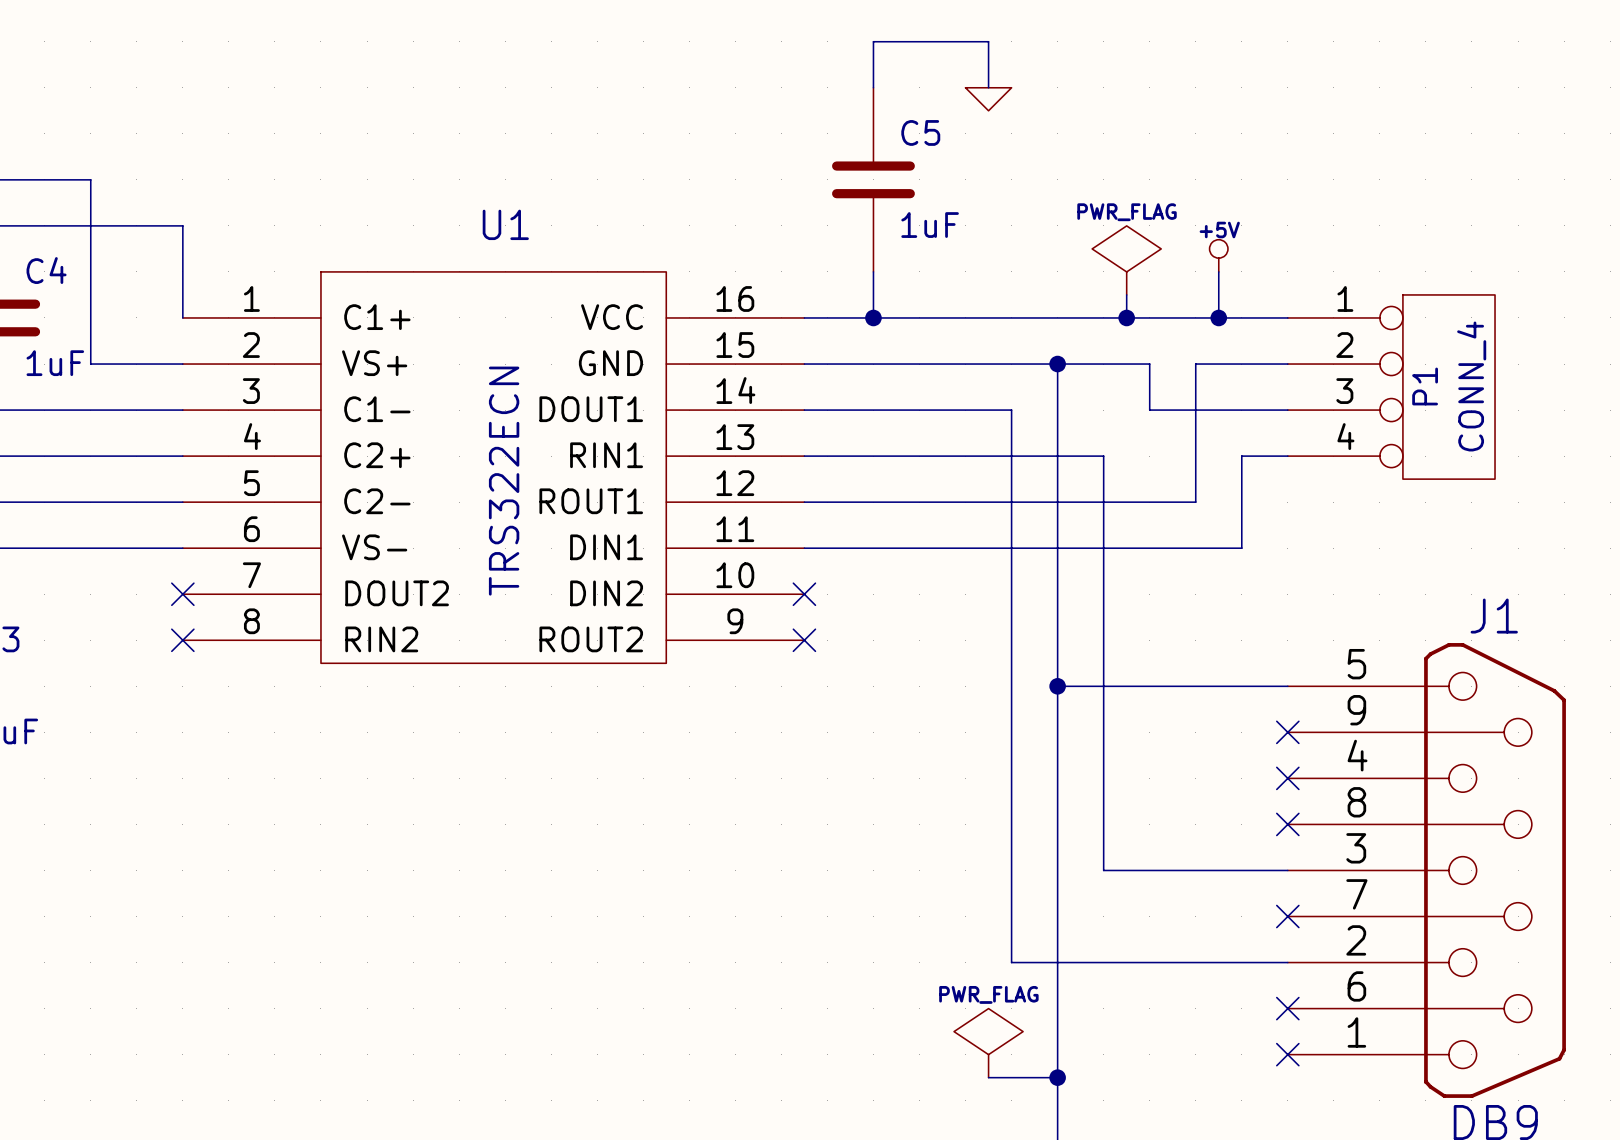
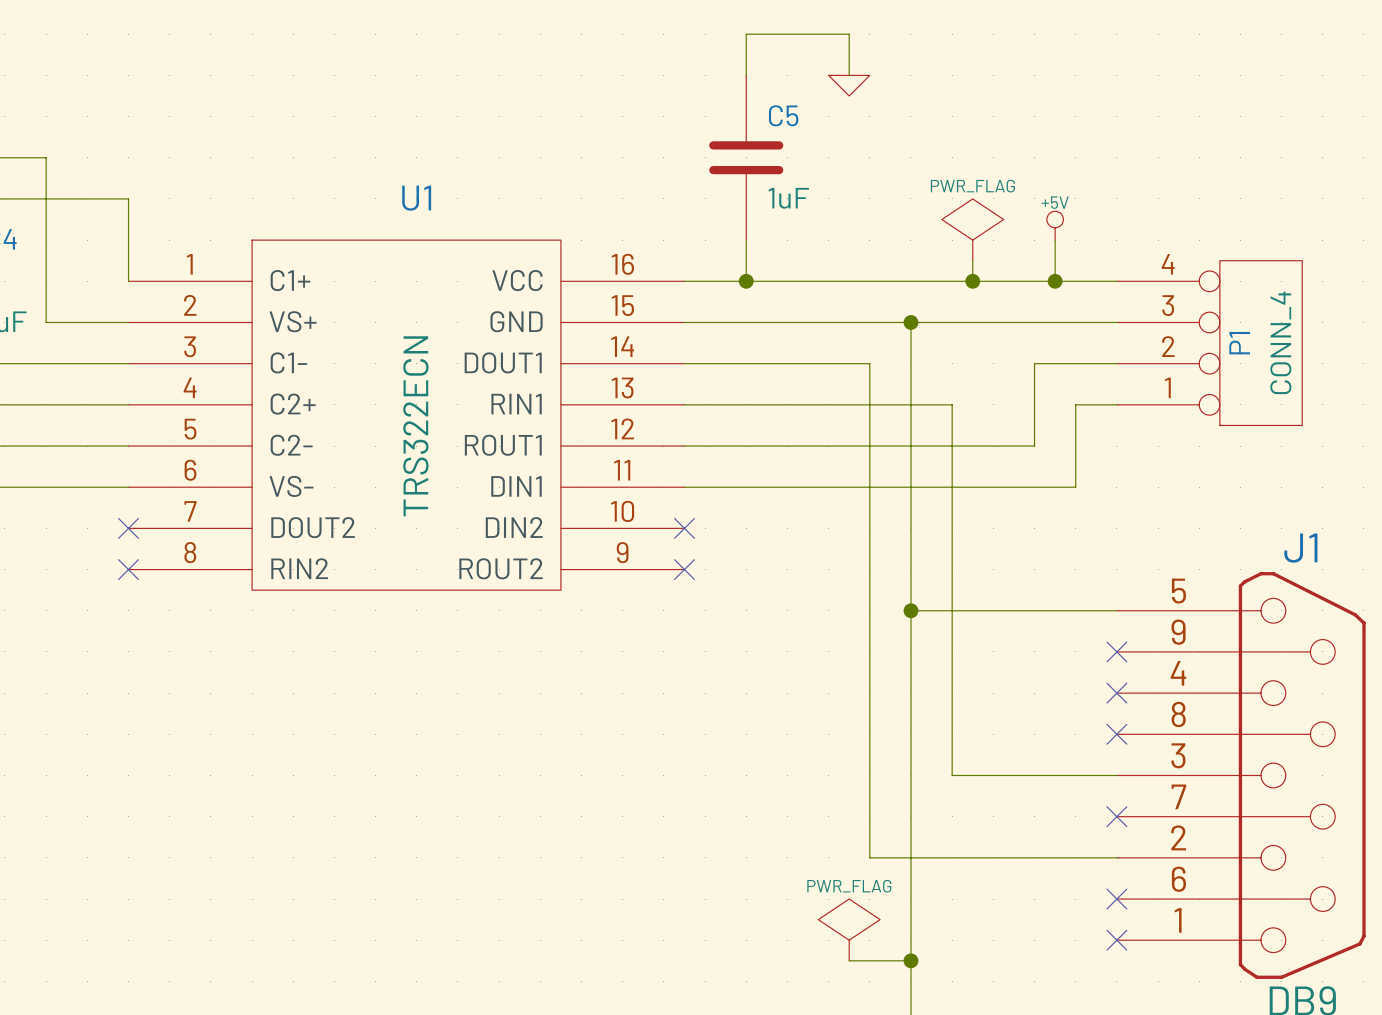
wire: (1149, 364) (1149, 410) (1195, 410) (1195, 364) -> (993, 322) (1034, 322)
P1 flip: as is (1448, 387) -> up-down (1261, 343)

